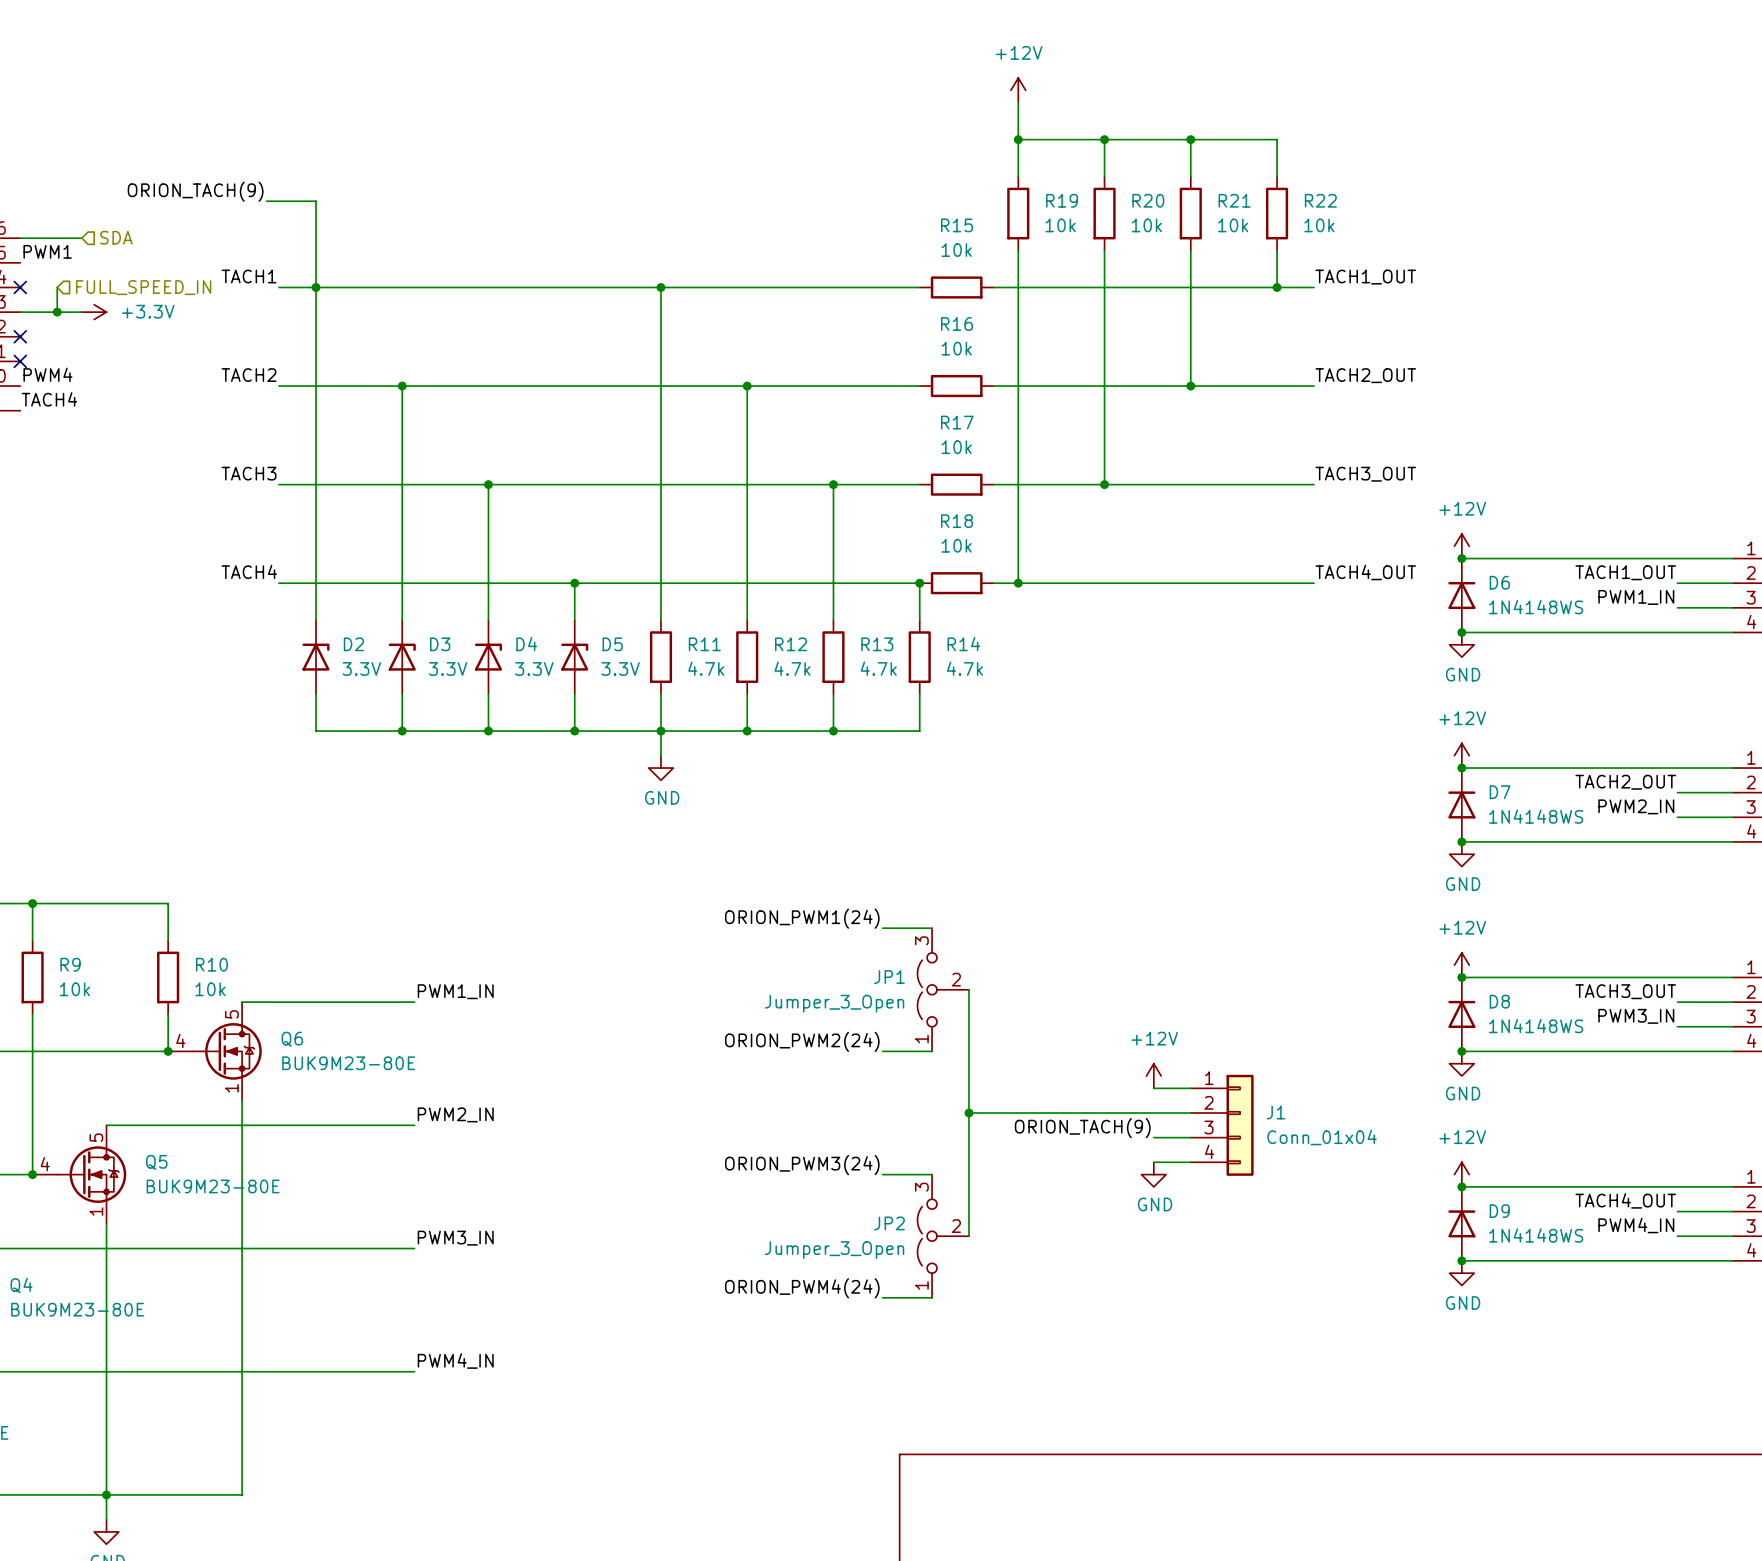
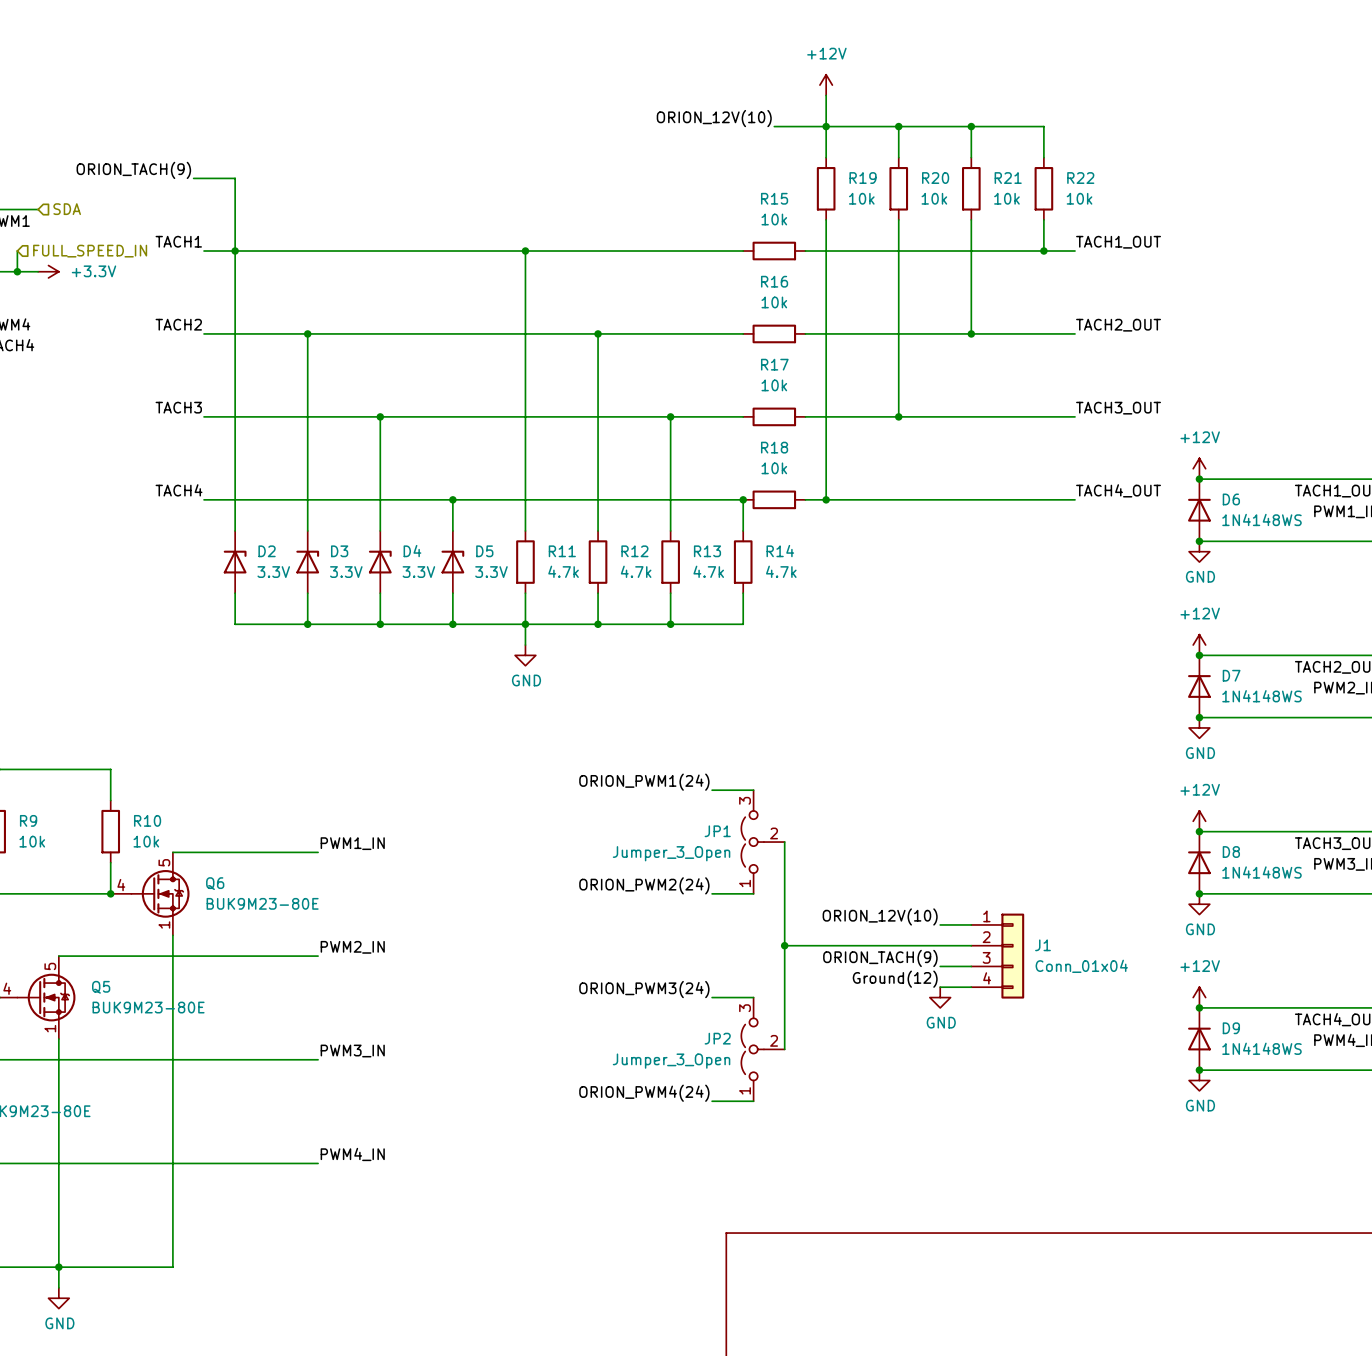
label: none -> ORION_12V(10) (714, 118)
wire: none -> (774, 126) (826, 126)
power symbol: +12V (1153, 1076) -> none
label: none -> ORION_12V(10) (880, 916)
label: none -> Ground(12) (895, 979)

